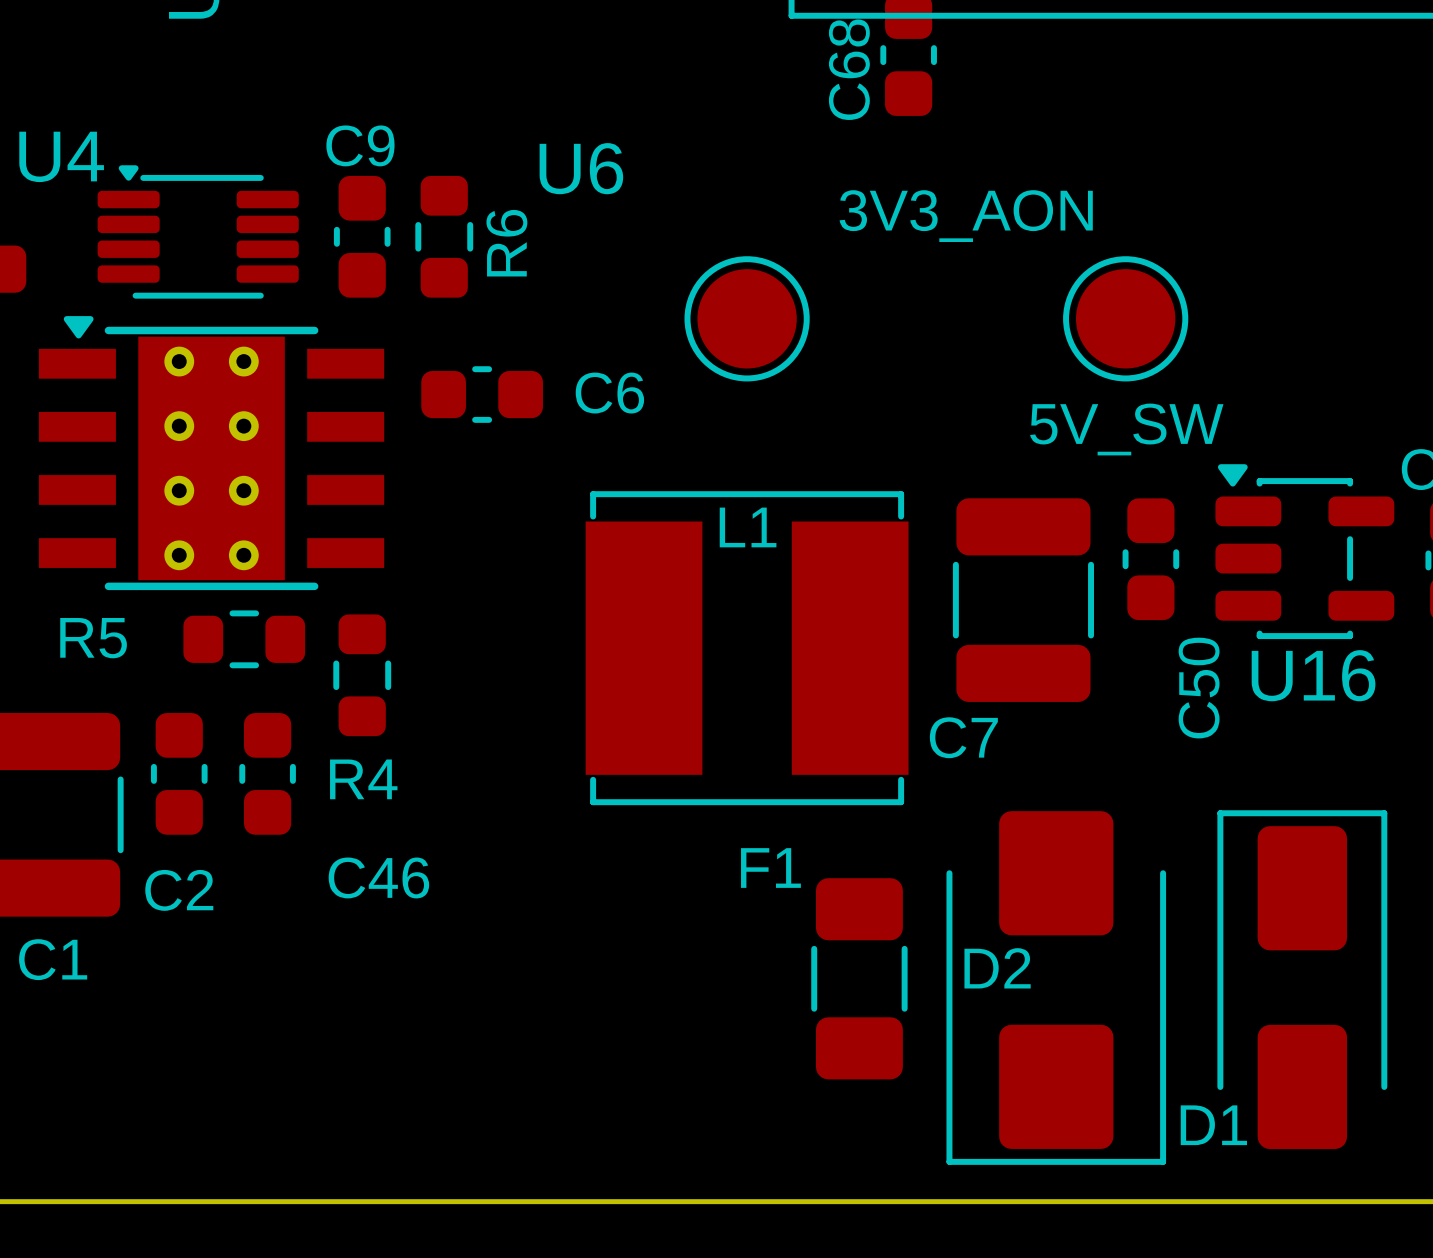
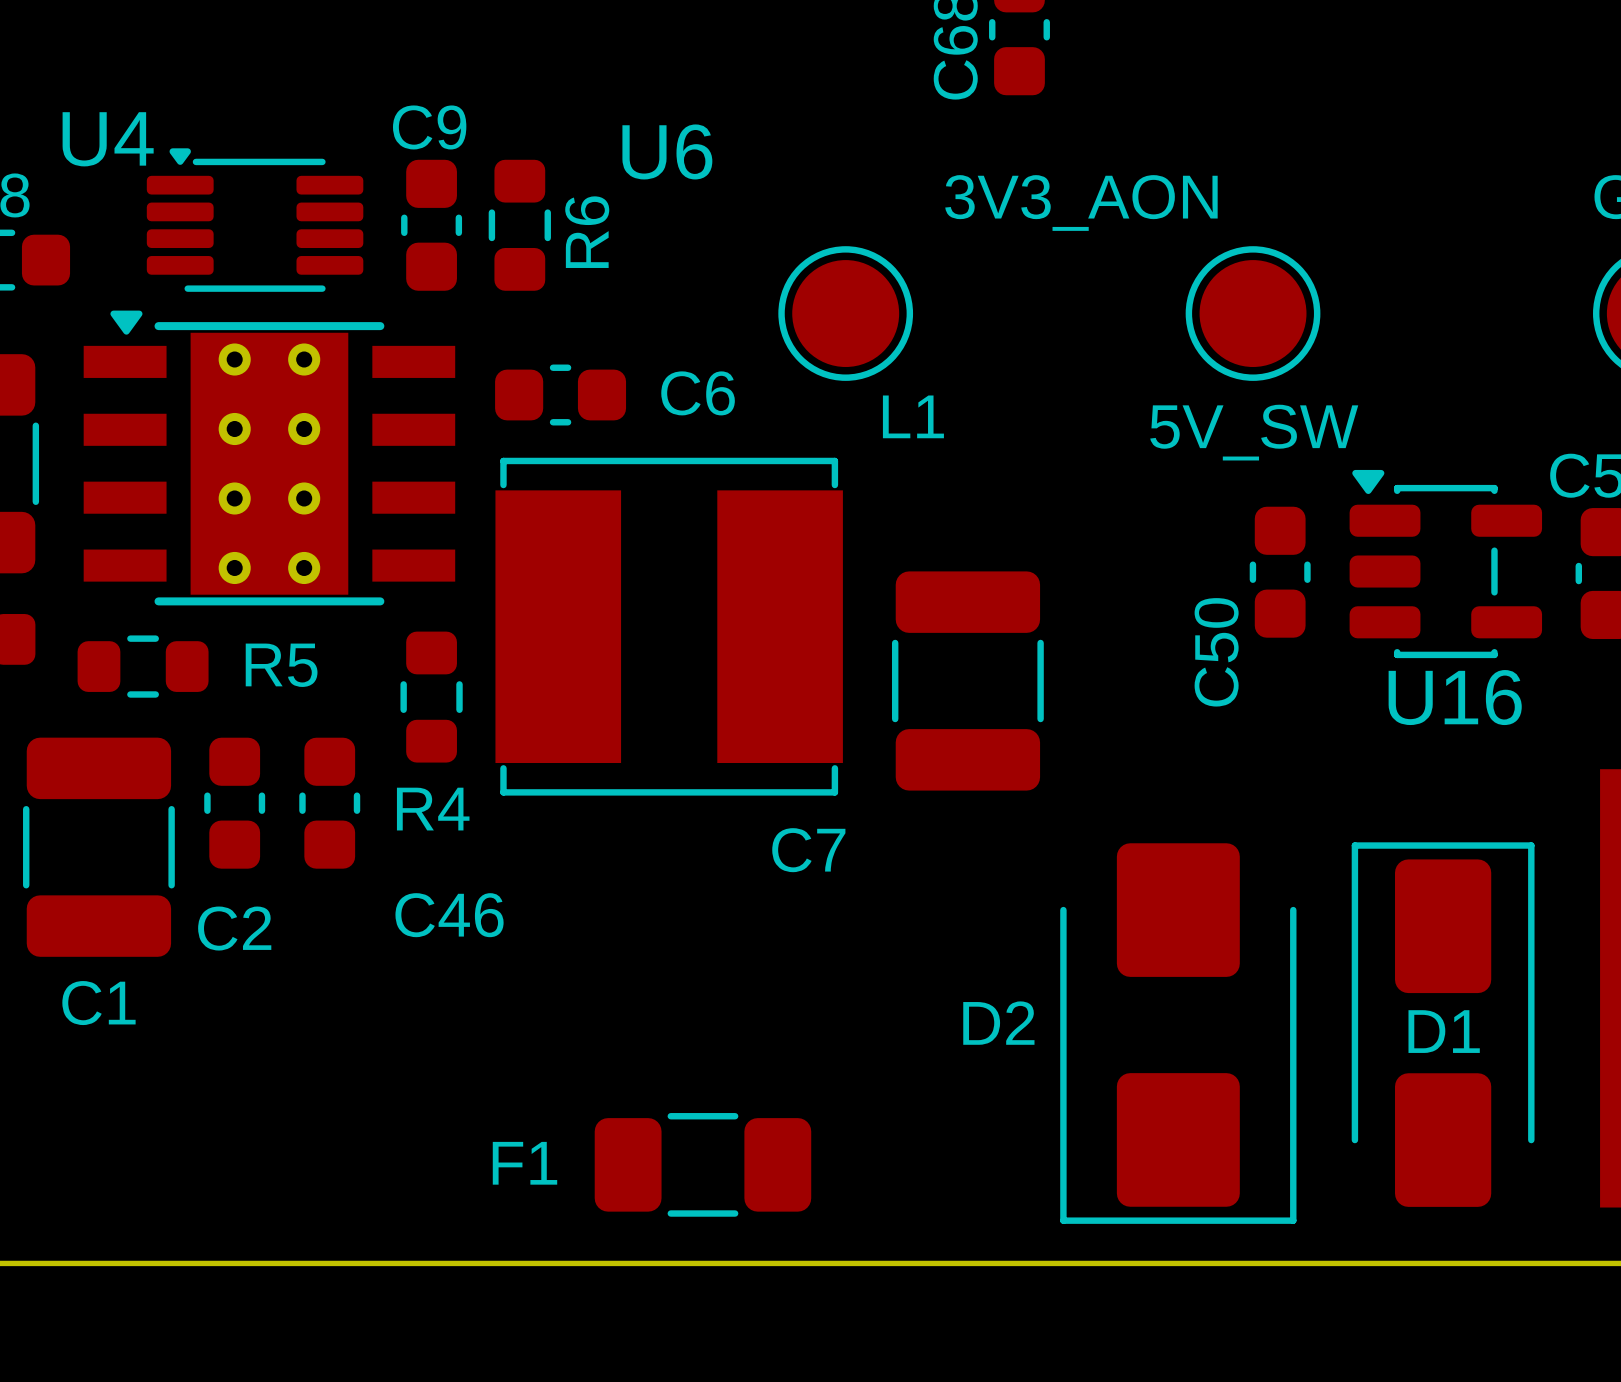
L1 name position: L1 (748, 527) -> L1 (913, 416)
C7 position: (1023, 600) -> (967, 680)
R5 name position: R5 (93, 638) -> R5 (281, 665)
R5 position: (244, 639) -> (143, 666)
L1 position: (747, 648) -> (669, 626)
C50 name position: C50 (1199, 688) -> C50 (1216, 652)
C7 name position: C7 (963, 737) -> C7 (808, 850)
F1 name position: F1 (770, 868) -> F1 (524, 1163)
D2 name position: D2 (997, 968) -> D2 (998, 1023)
F1 rotation: 0° (859, 978) -> 90° clockwise (702, 1164)
F1 position: (859, 978) -> (702, 1164)
D1 name position: D1 (1213, 1125) -> D1 (1444, 1031)

